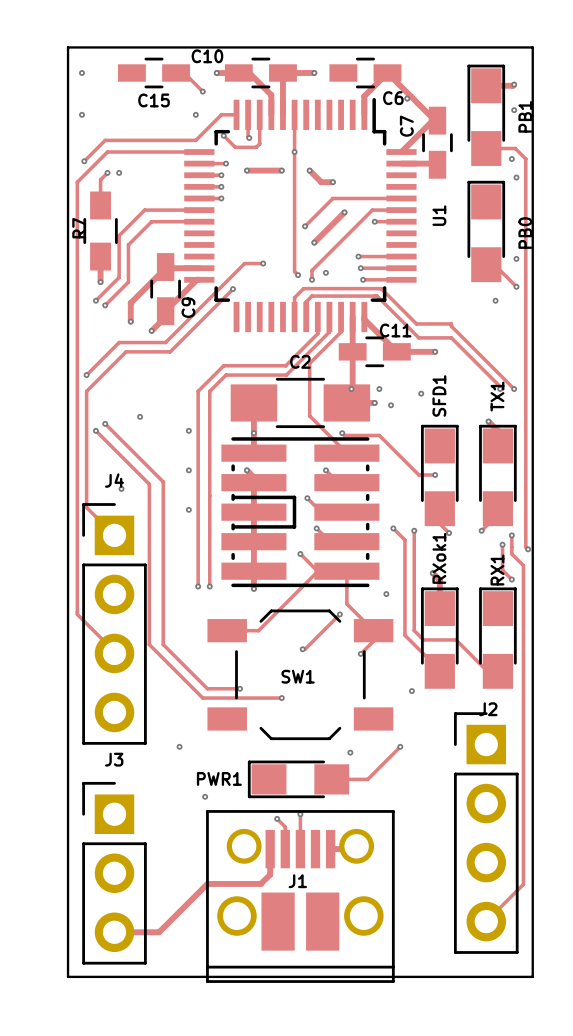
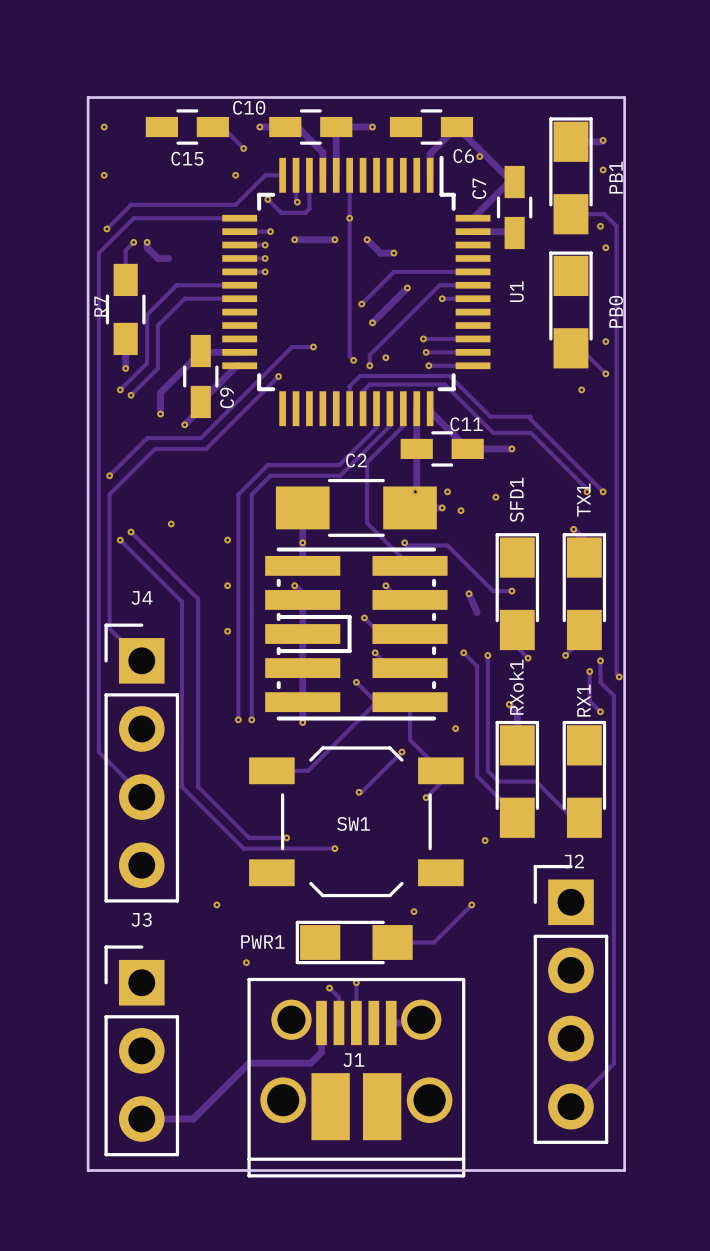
track: none -> (147, 242) (147, 247) (157, 258) (168, 258)
track: none -> (469, 593) (477, 612)
via: none -> (469, 593)
via: (121, 488) -> none

